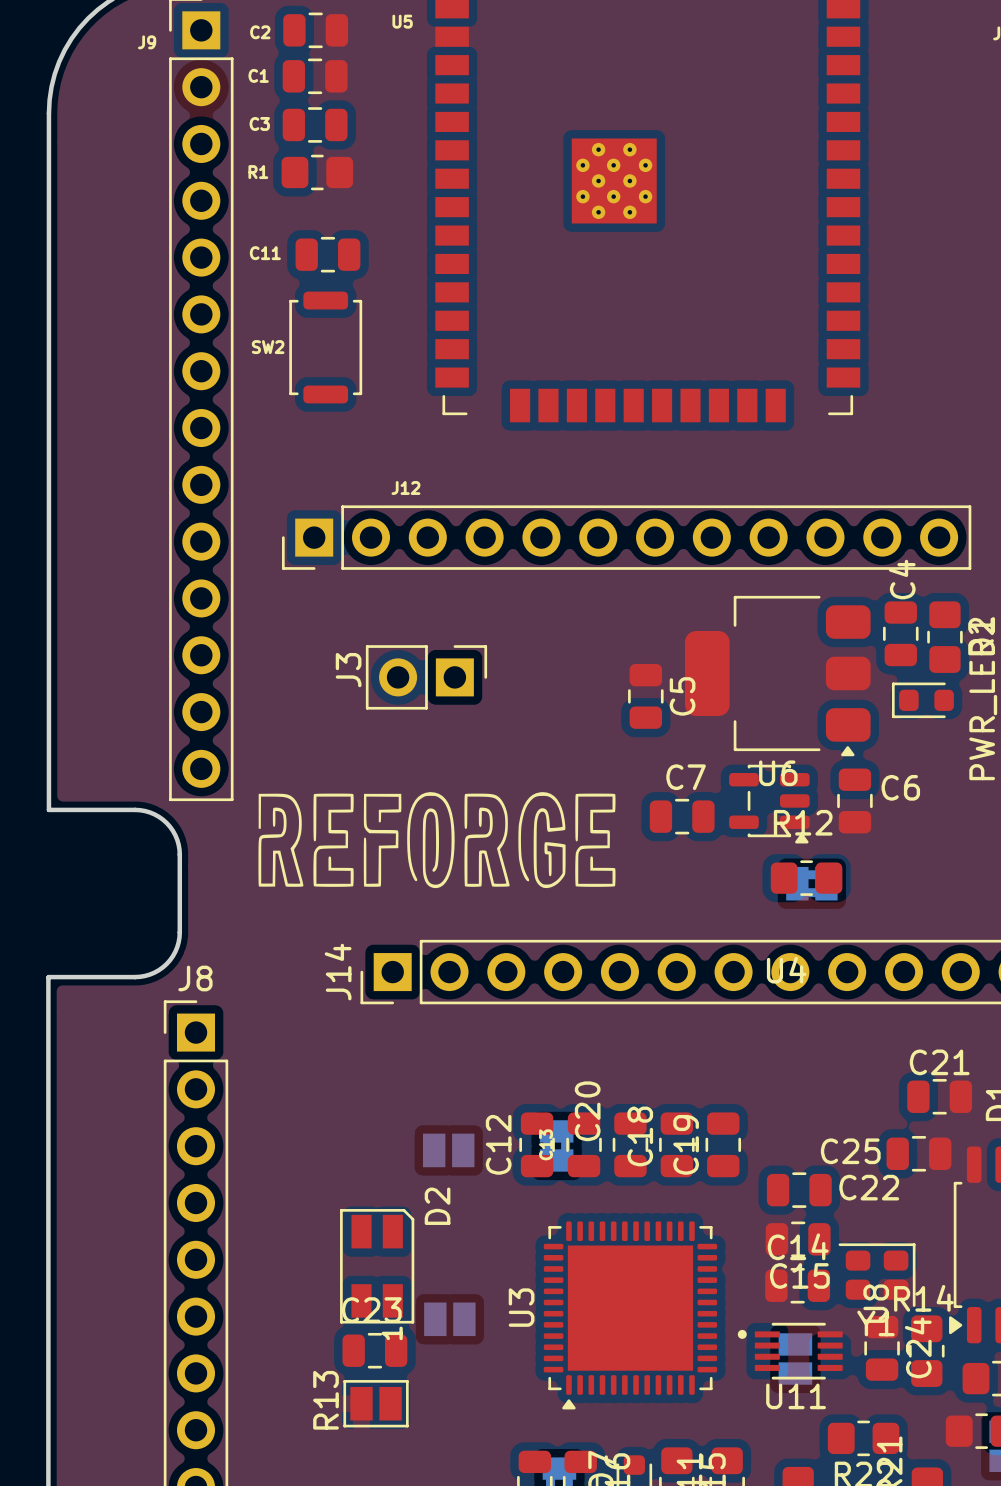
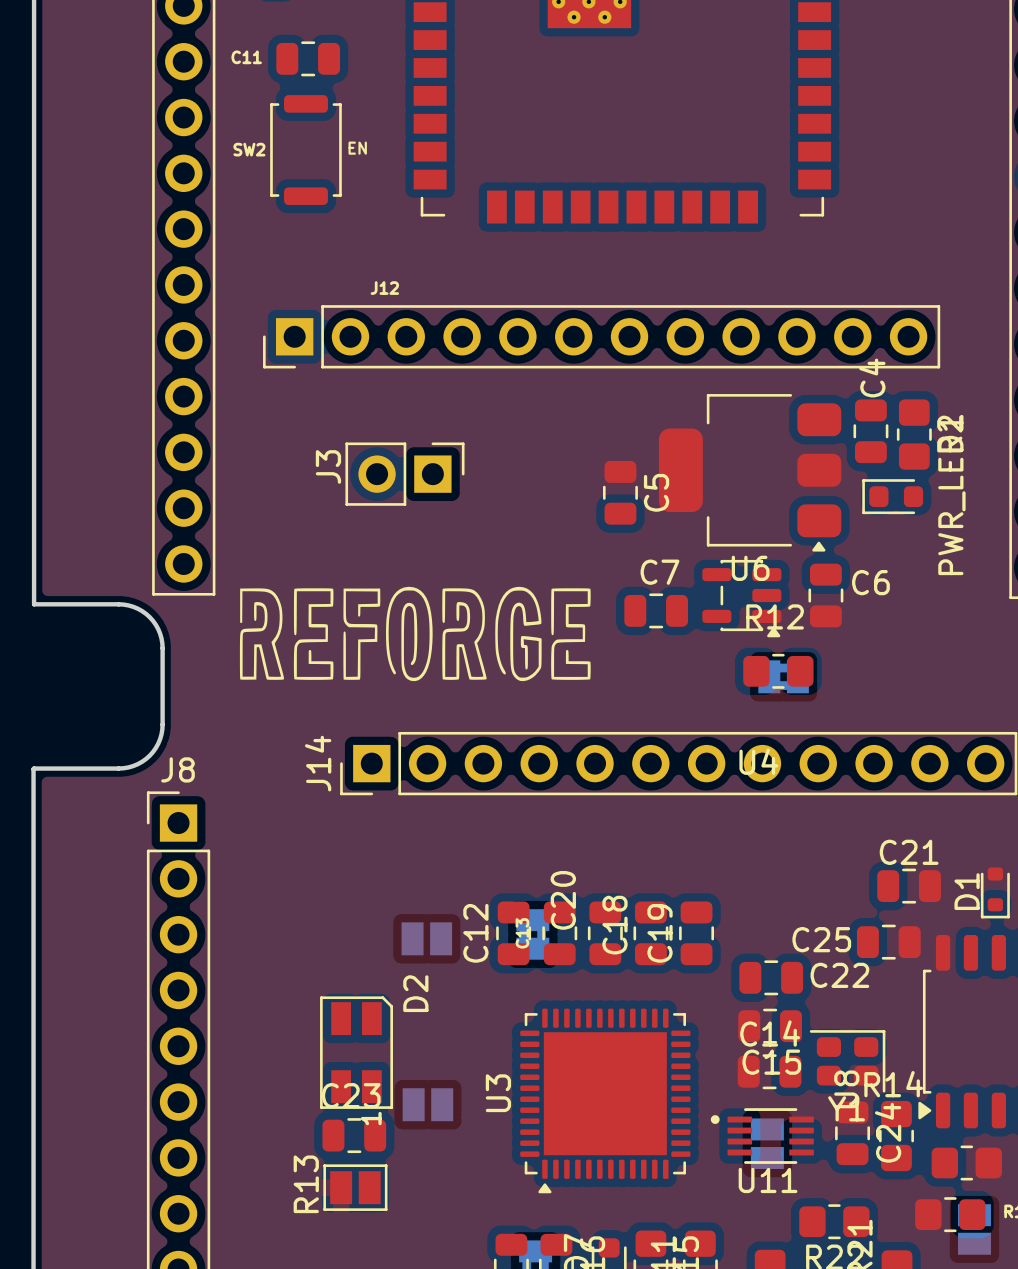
text: none -> EN (357, 148)

